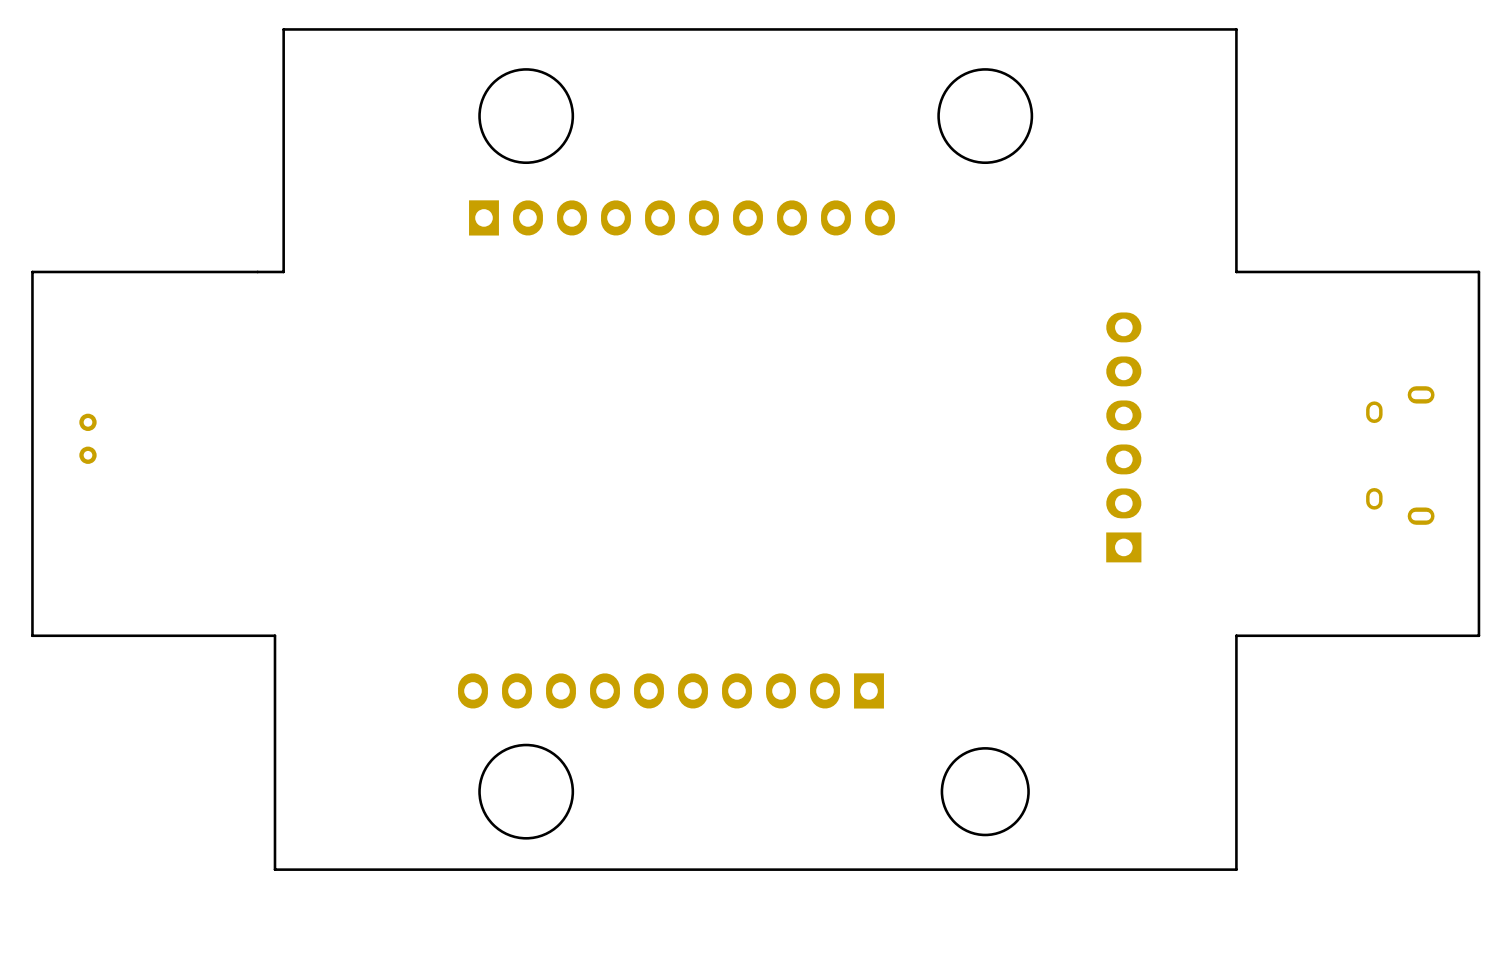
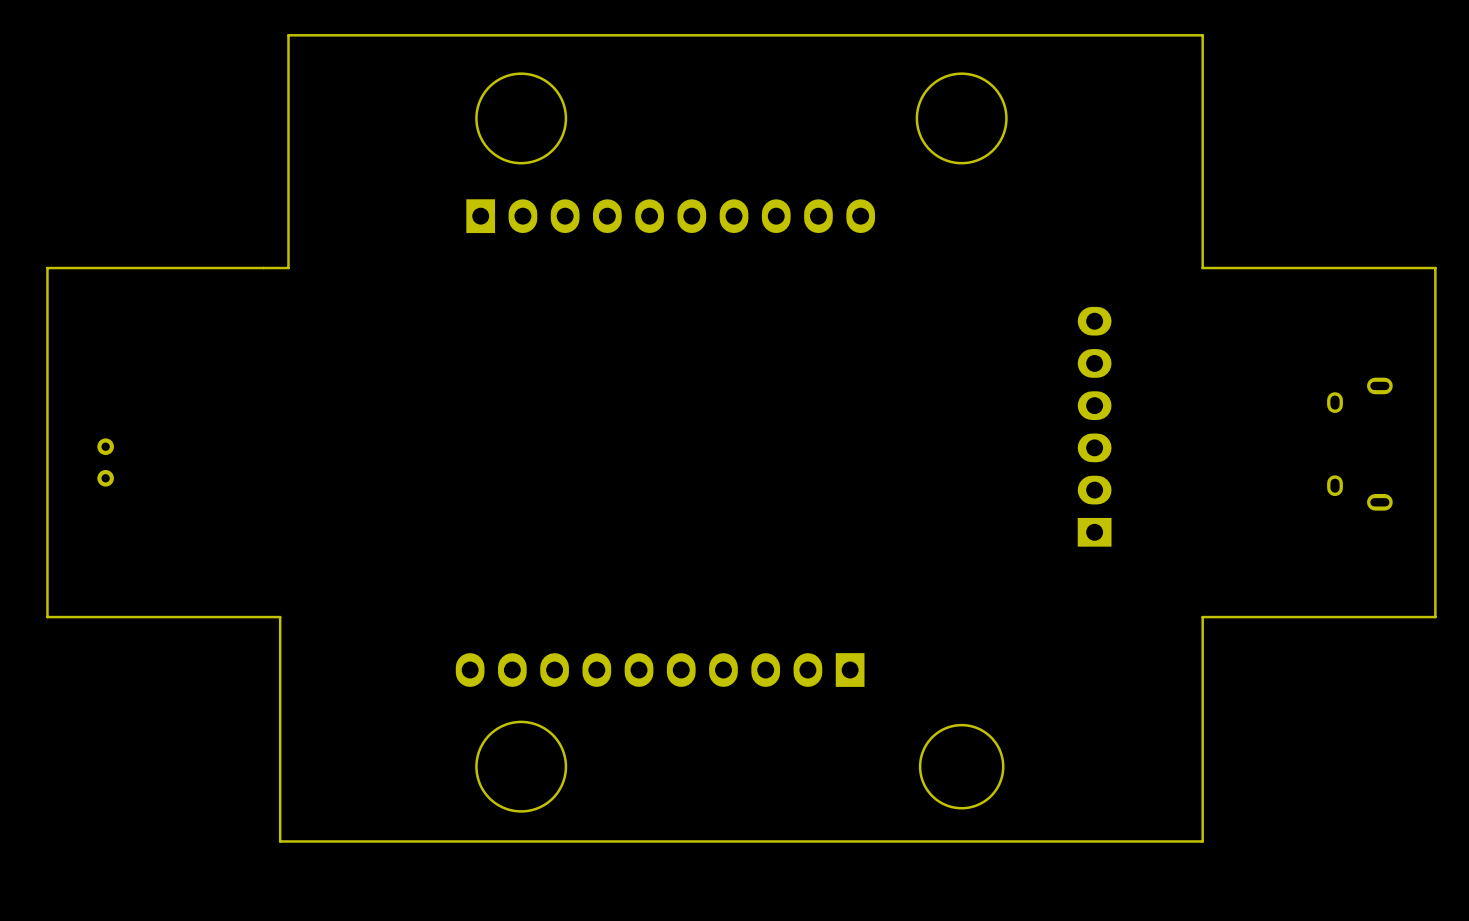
part position: (87, 438) -> (105, 462)

